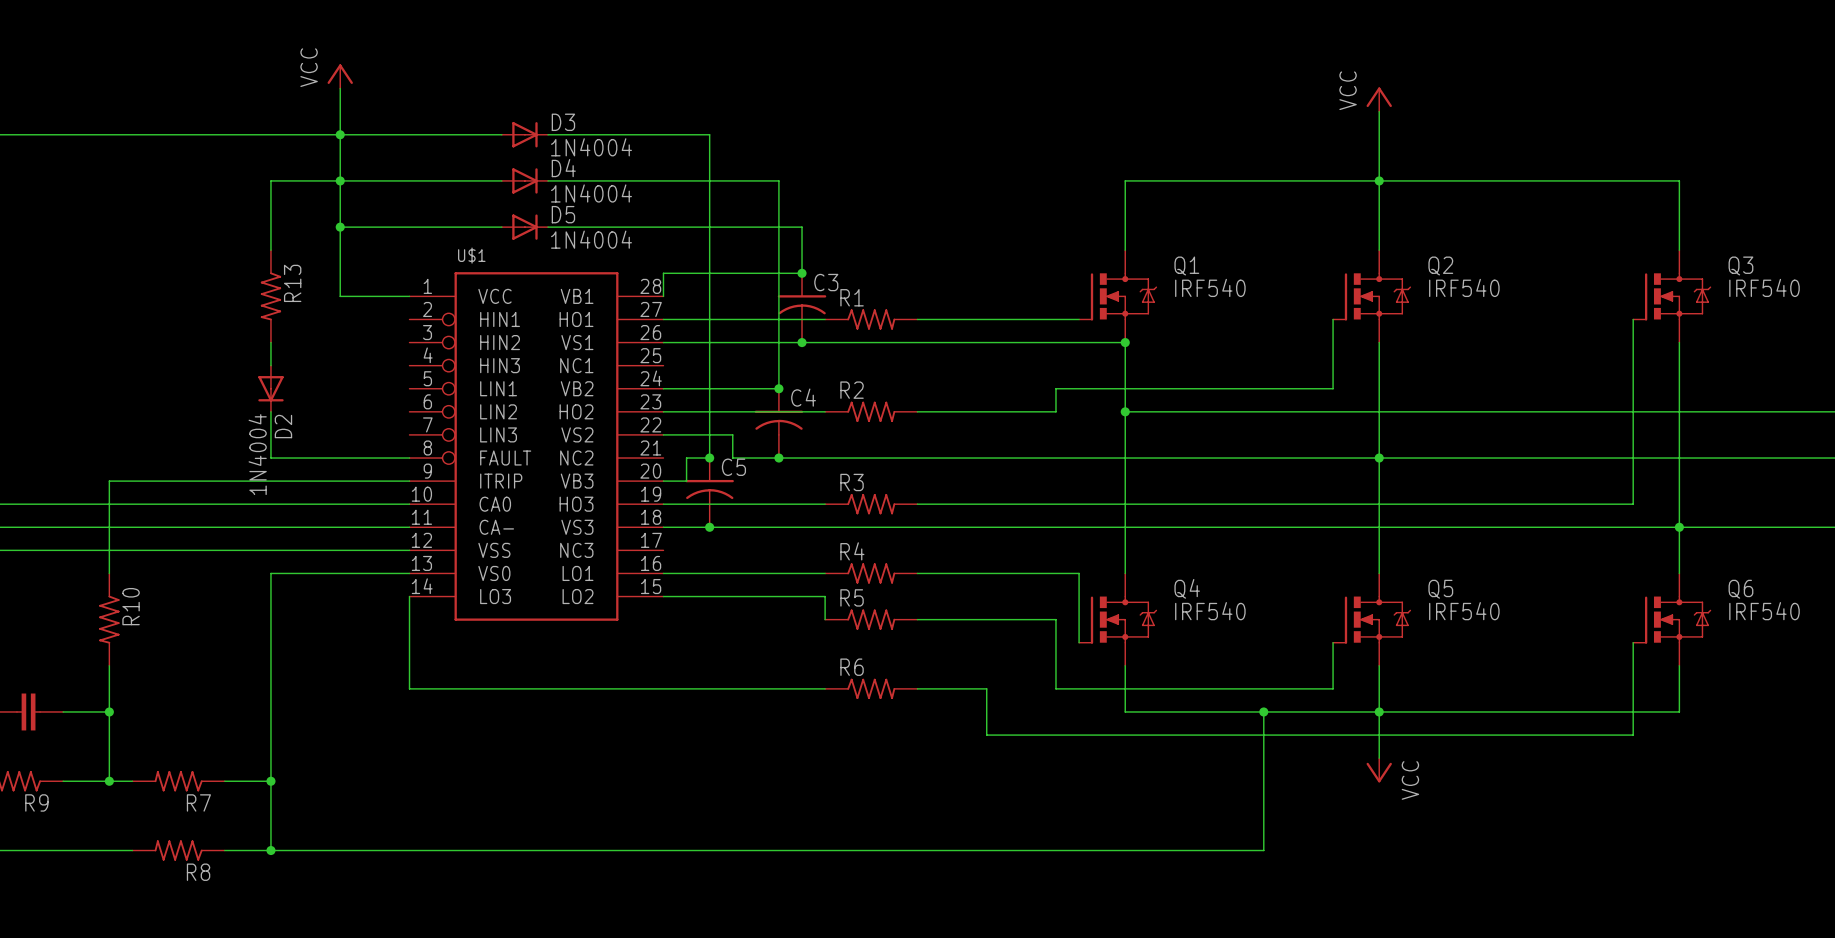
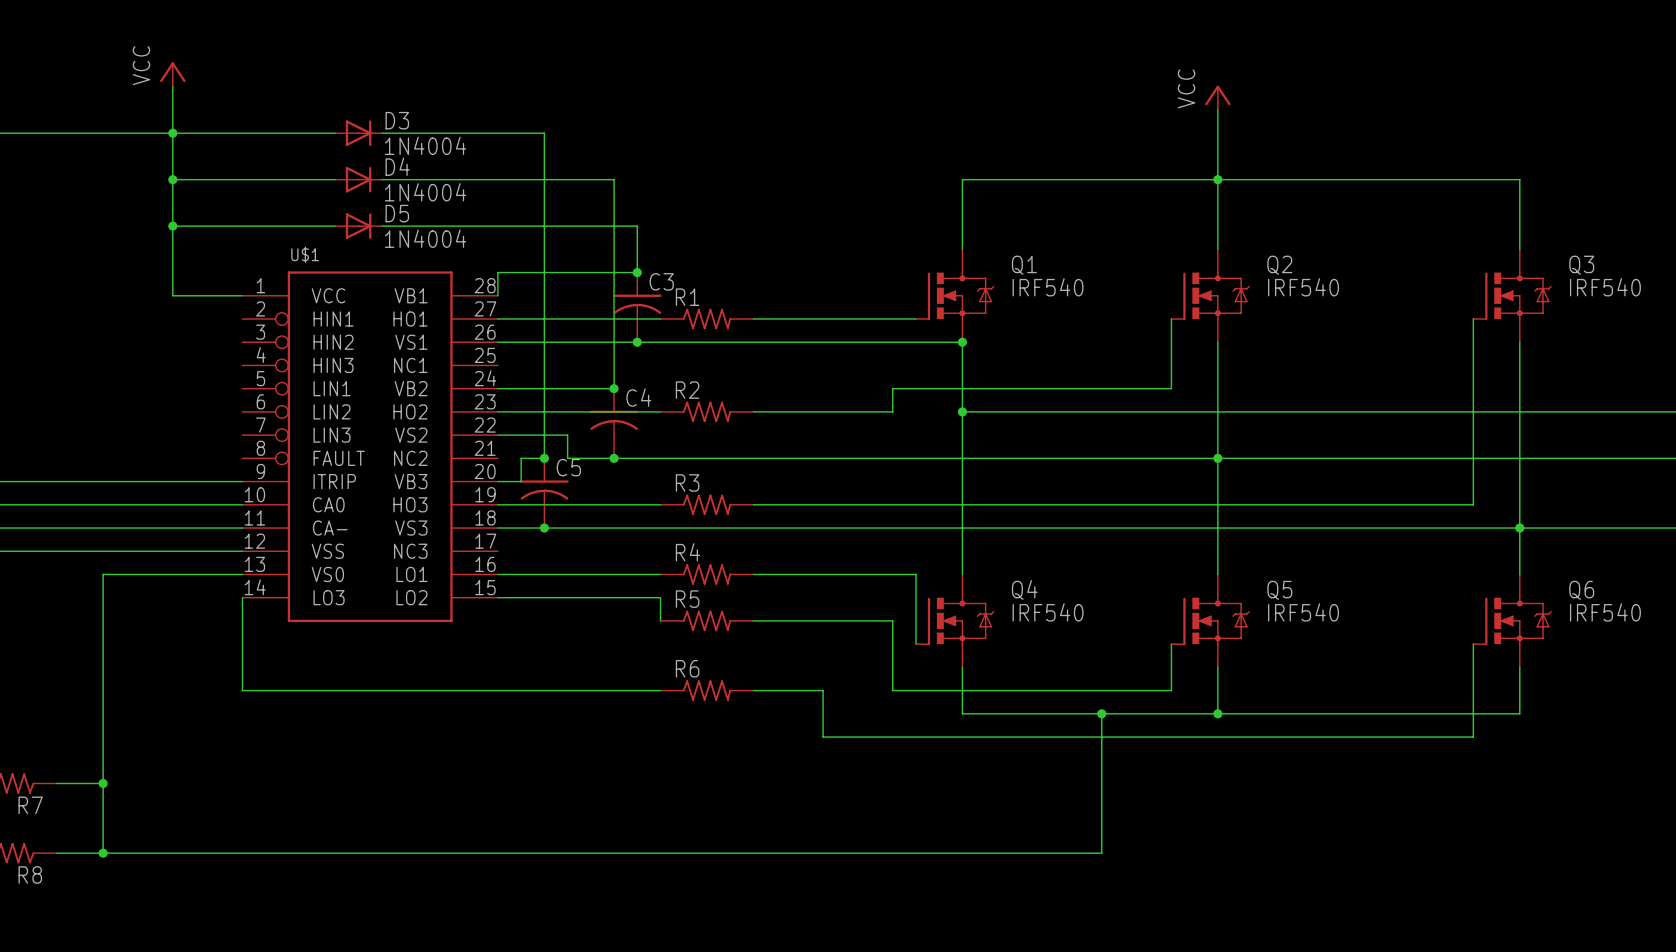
wire: (340, 180) (270, 180) (270, 250) -> none
R13: (270, 296) -> none
wire: (270, 342) (270, 365) -> none
D2: 1N4004 (270, 388) -> none
wire: (270, 411) (270, 458) (409, 458) -> none
wire: (1379, 711) (1379, 758) -> none
power symbol: VCC (1379, 770) -> none

